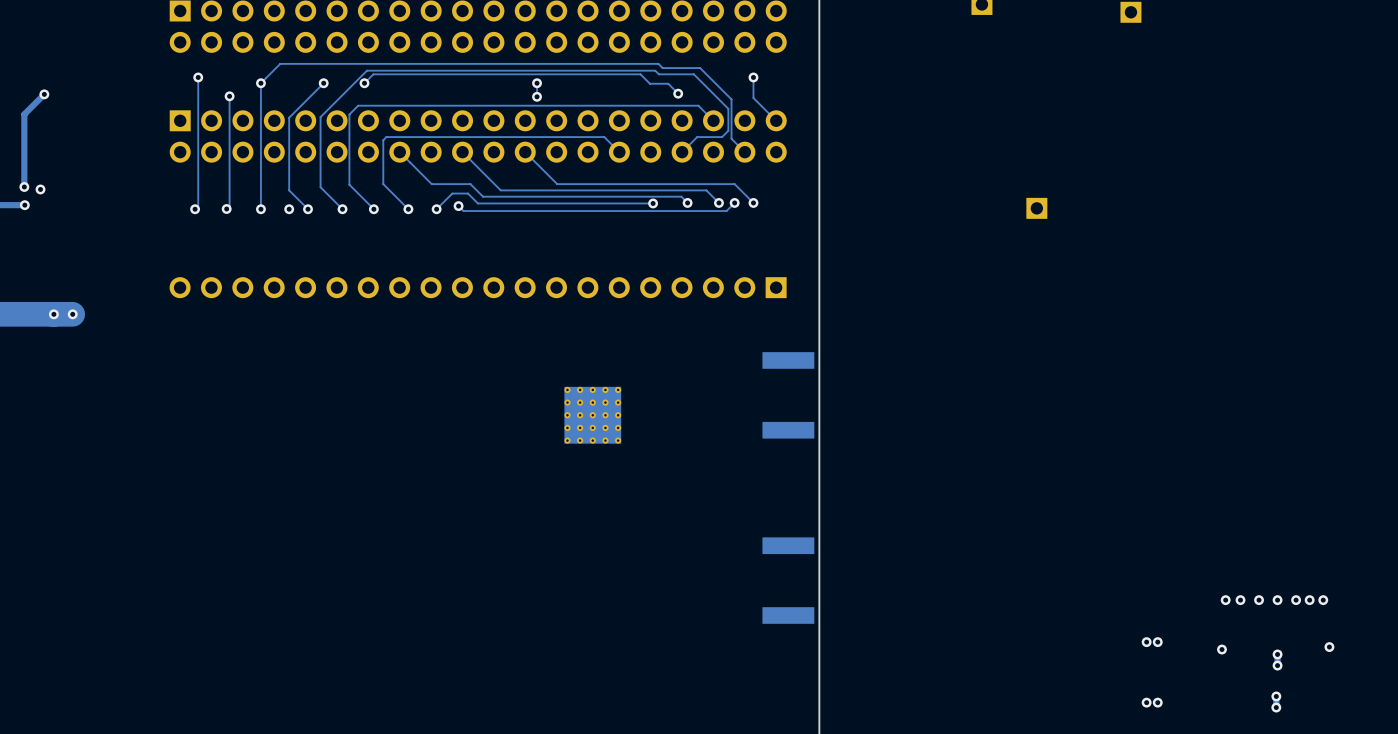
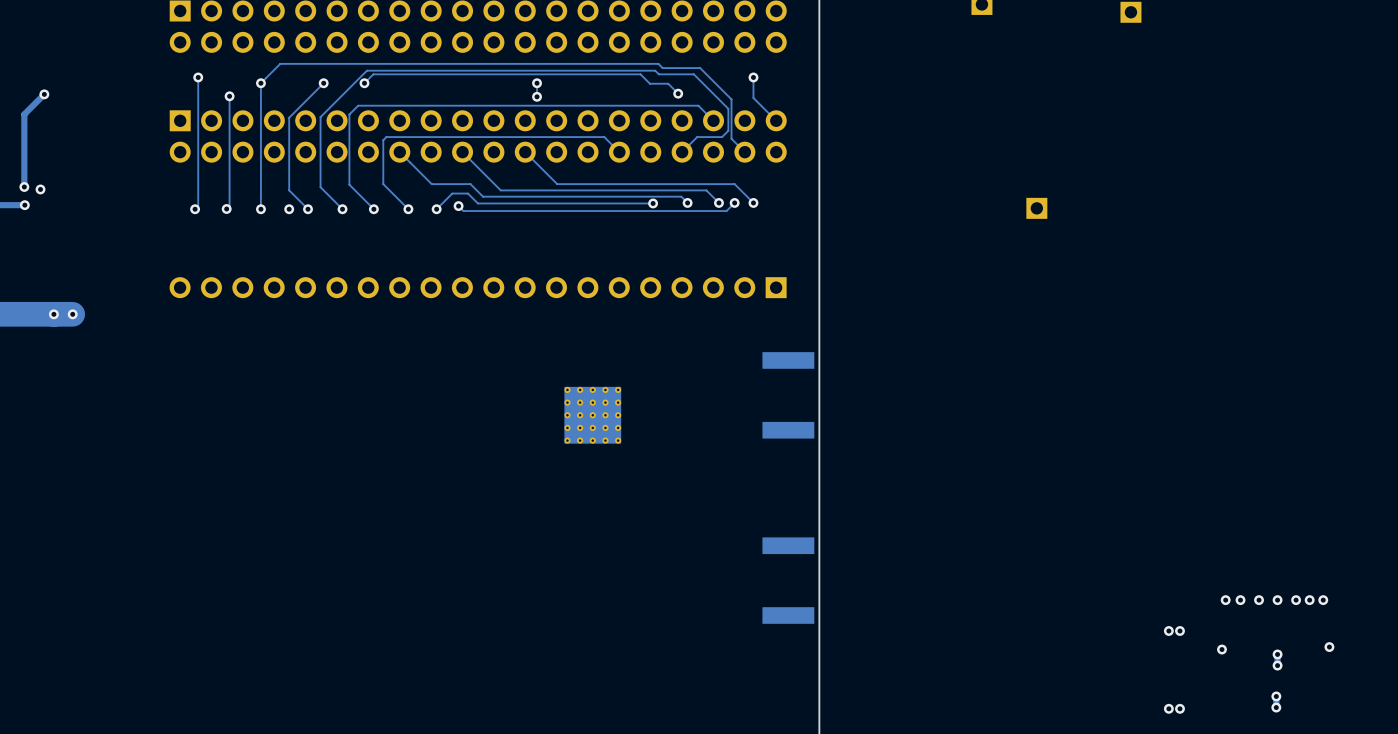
via: none -> (1168, 631)
via: none -> (1179, 631)
via: (1146, 642) -> none
via: (1157, 642) -> none
via: (1146, 702) -> none
via: (1157, 702) -> none
via: none -> (1168, 708)
via: none -> (1179, 708)

